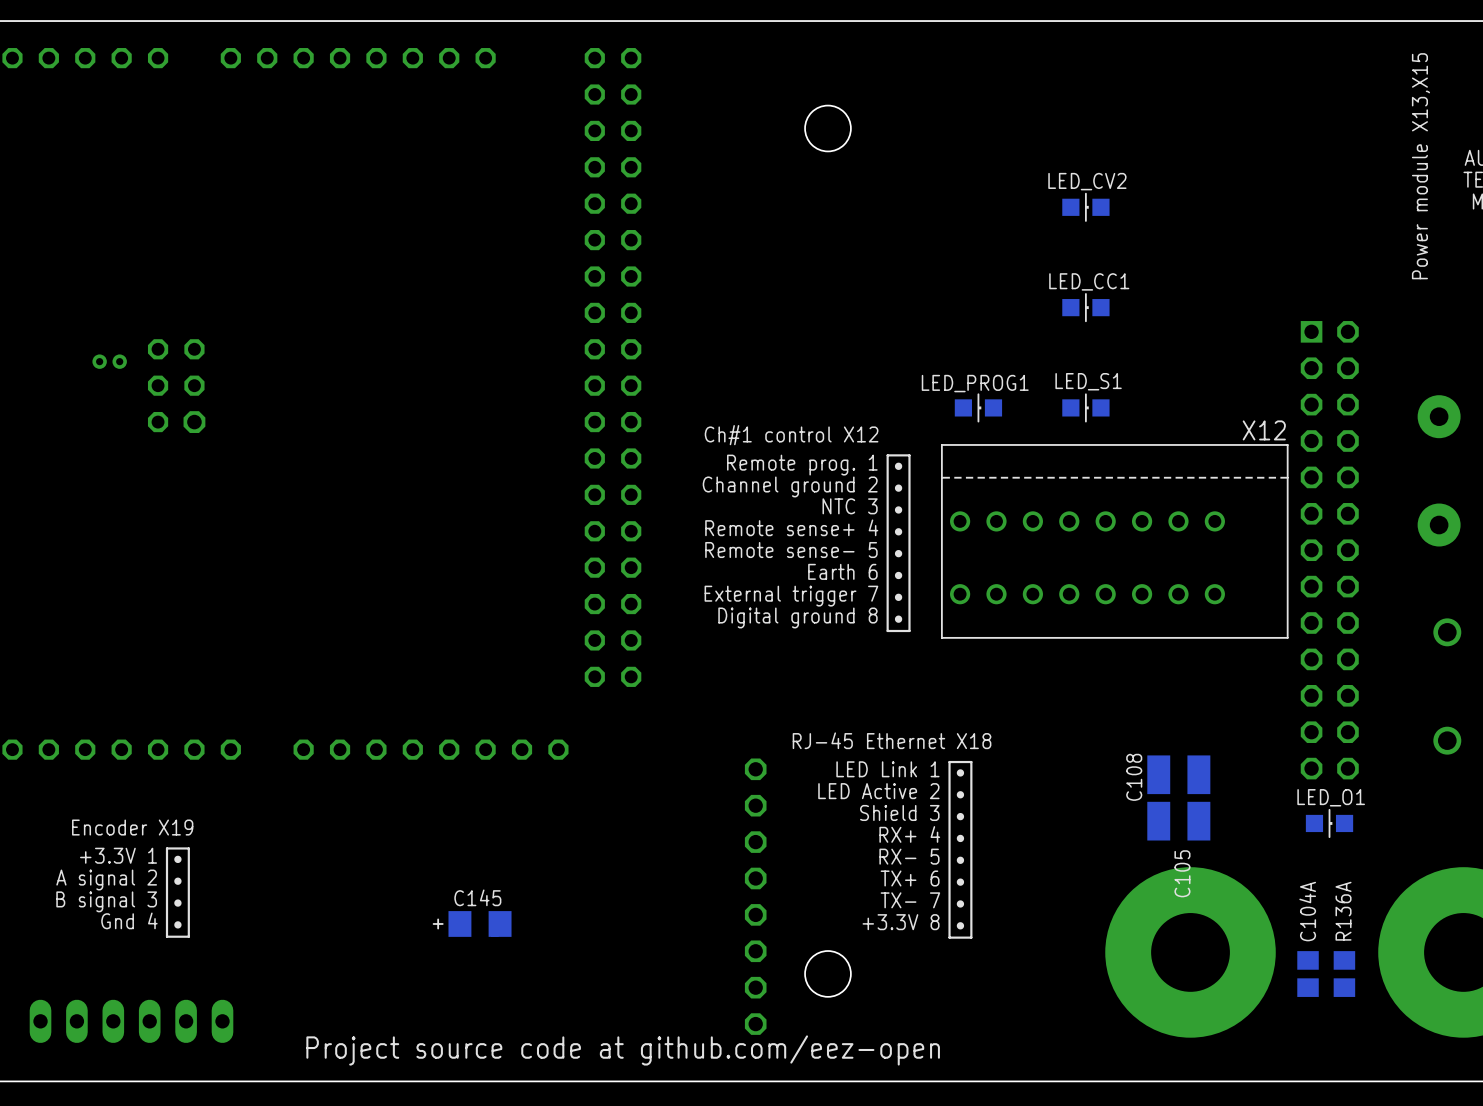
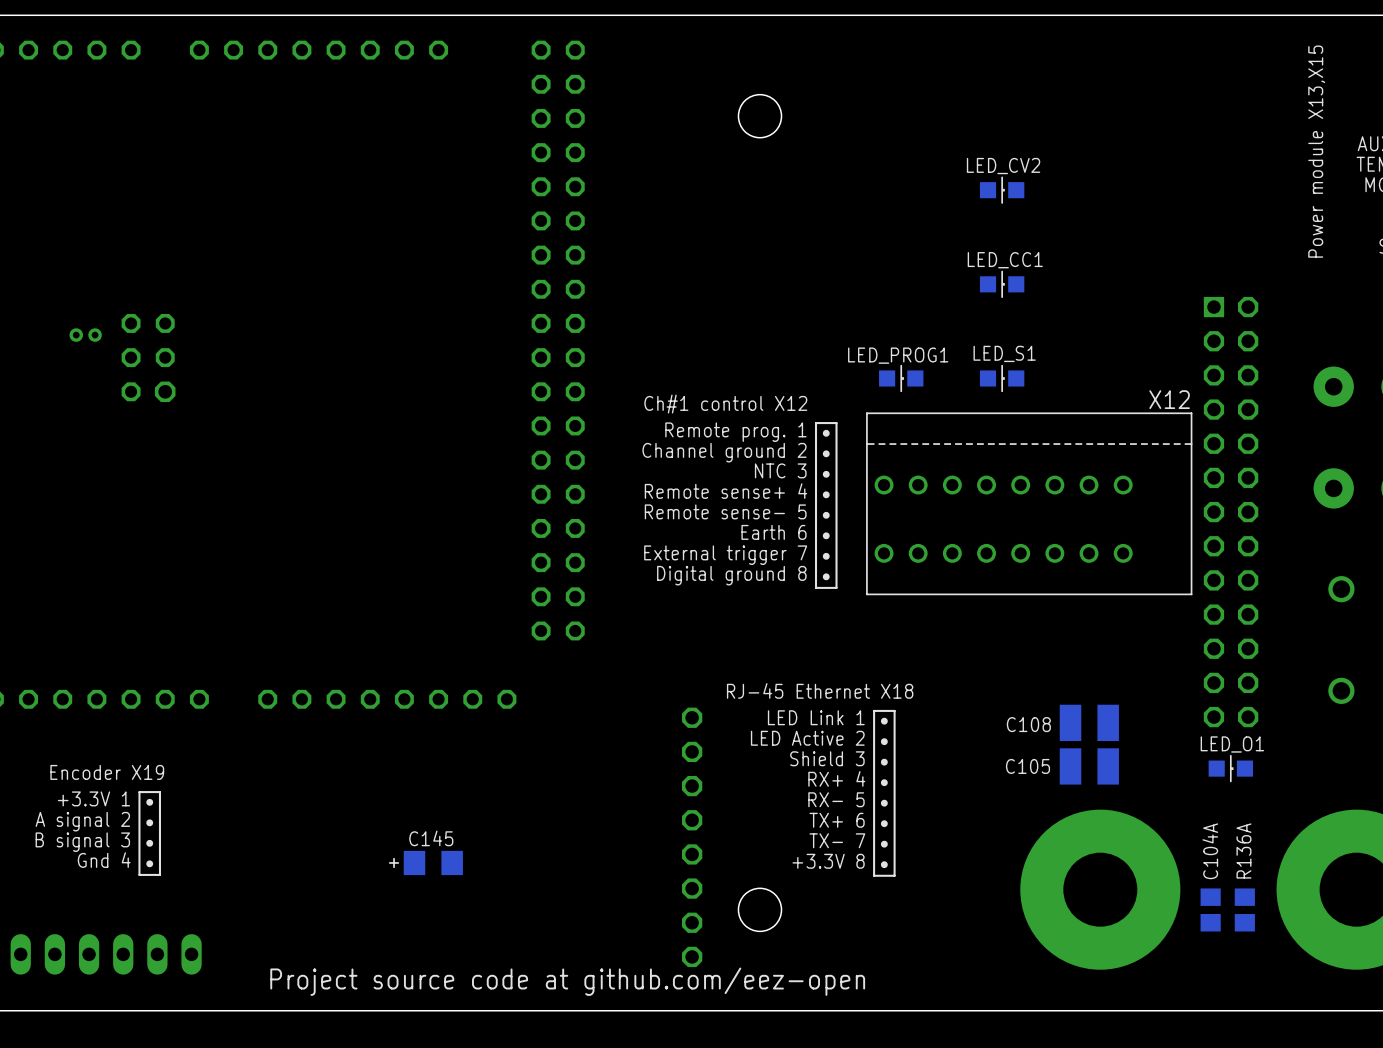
C108 name rotation: 0° (1134, 777) -> 90° clockwise (1028, 724)
C105 name rotation: 0° (1182, 873) -> 90° clockwise (1028, 766)
C105 name position: C105 (1182, 873) -> C105 (1028, 766)

